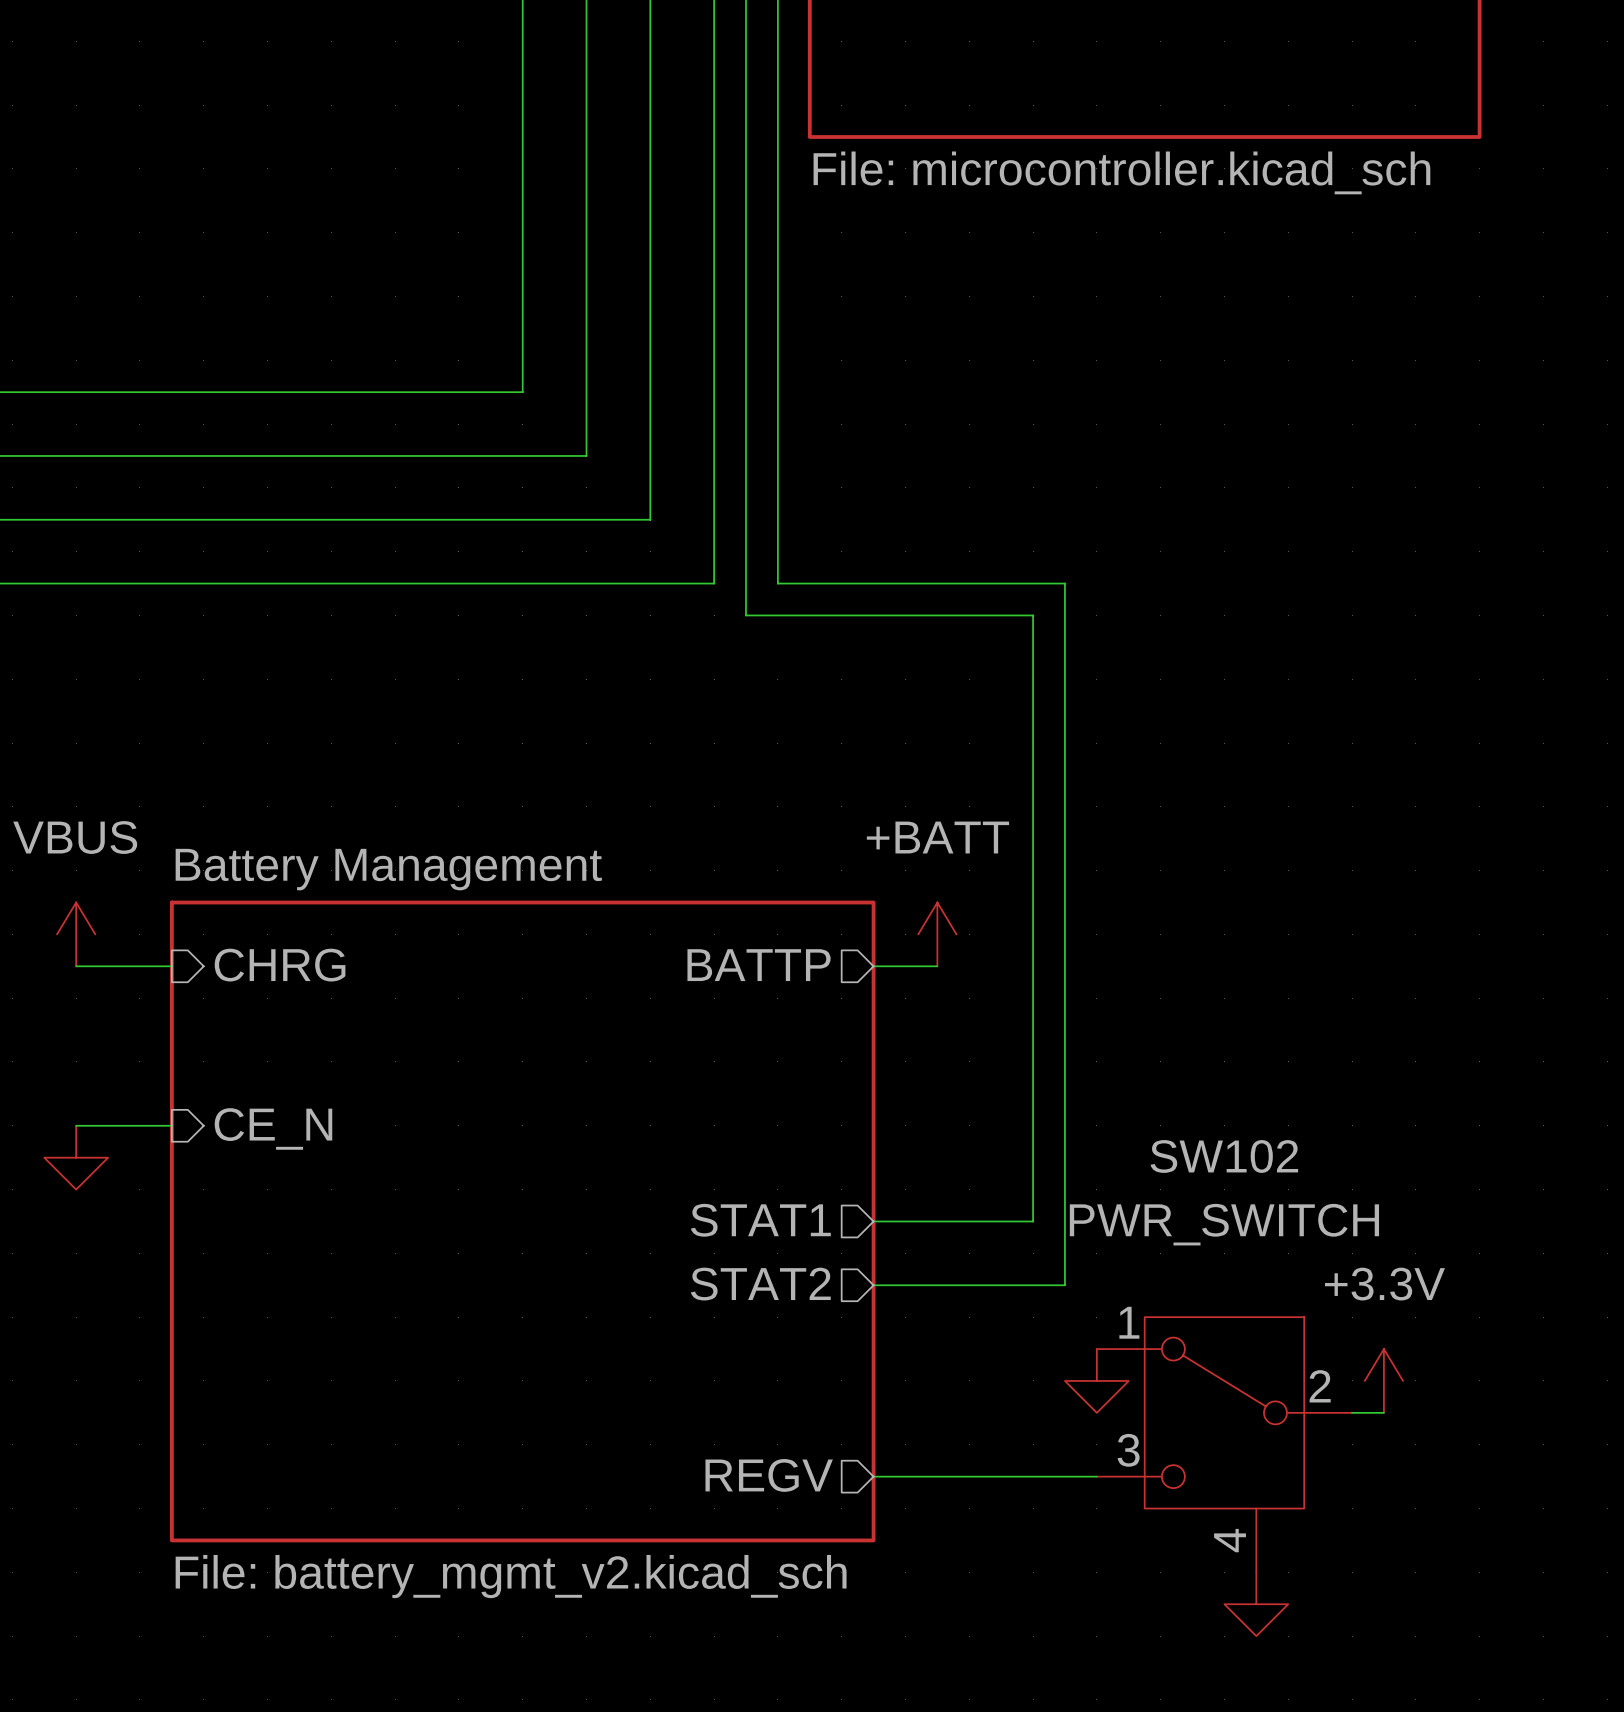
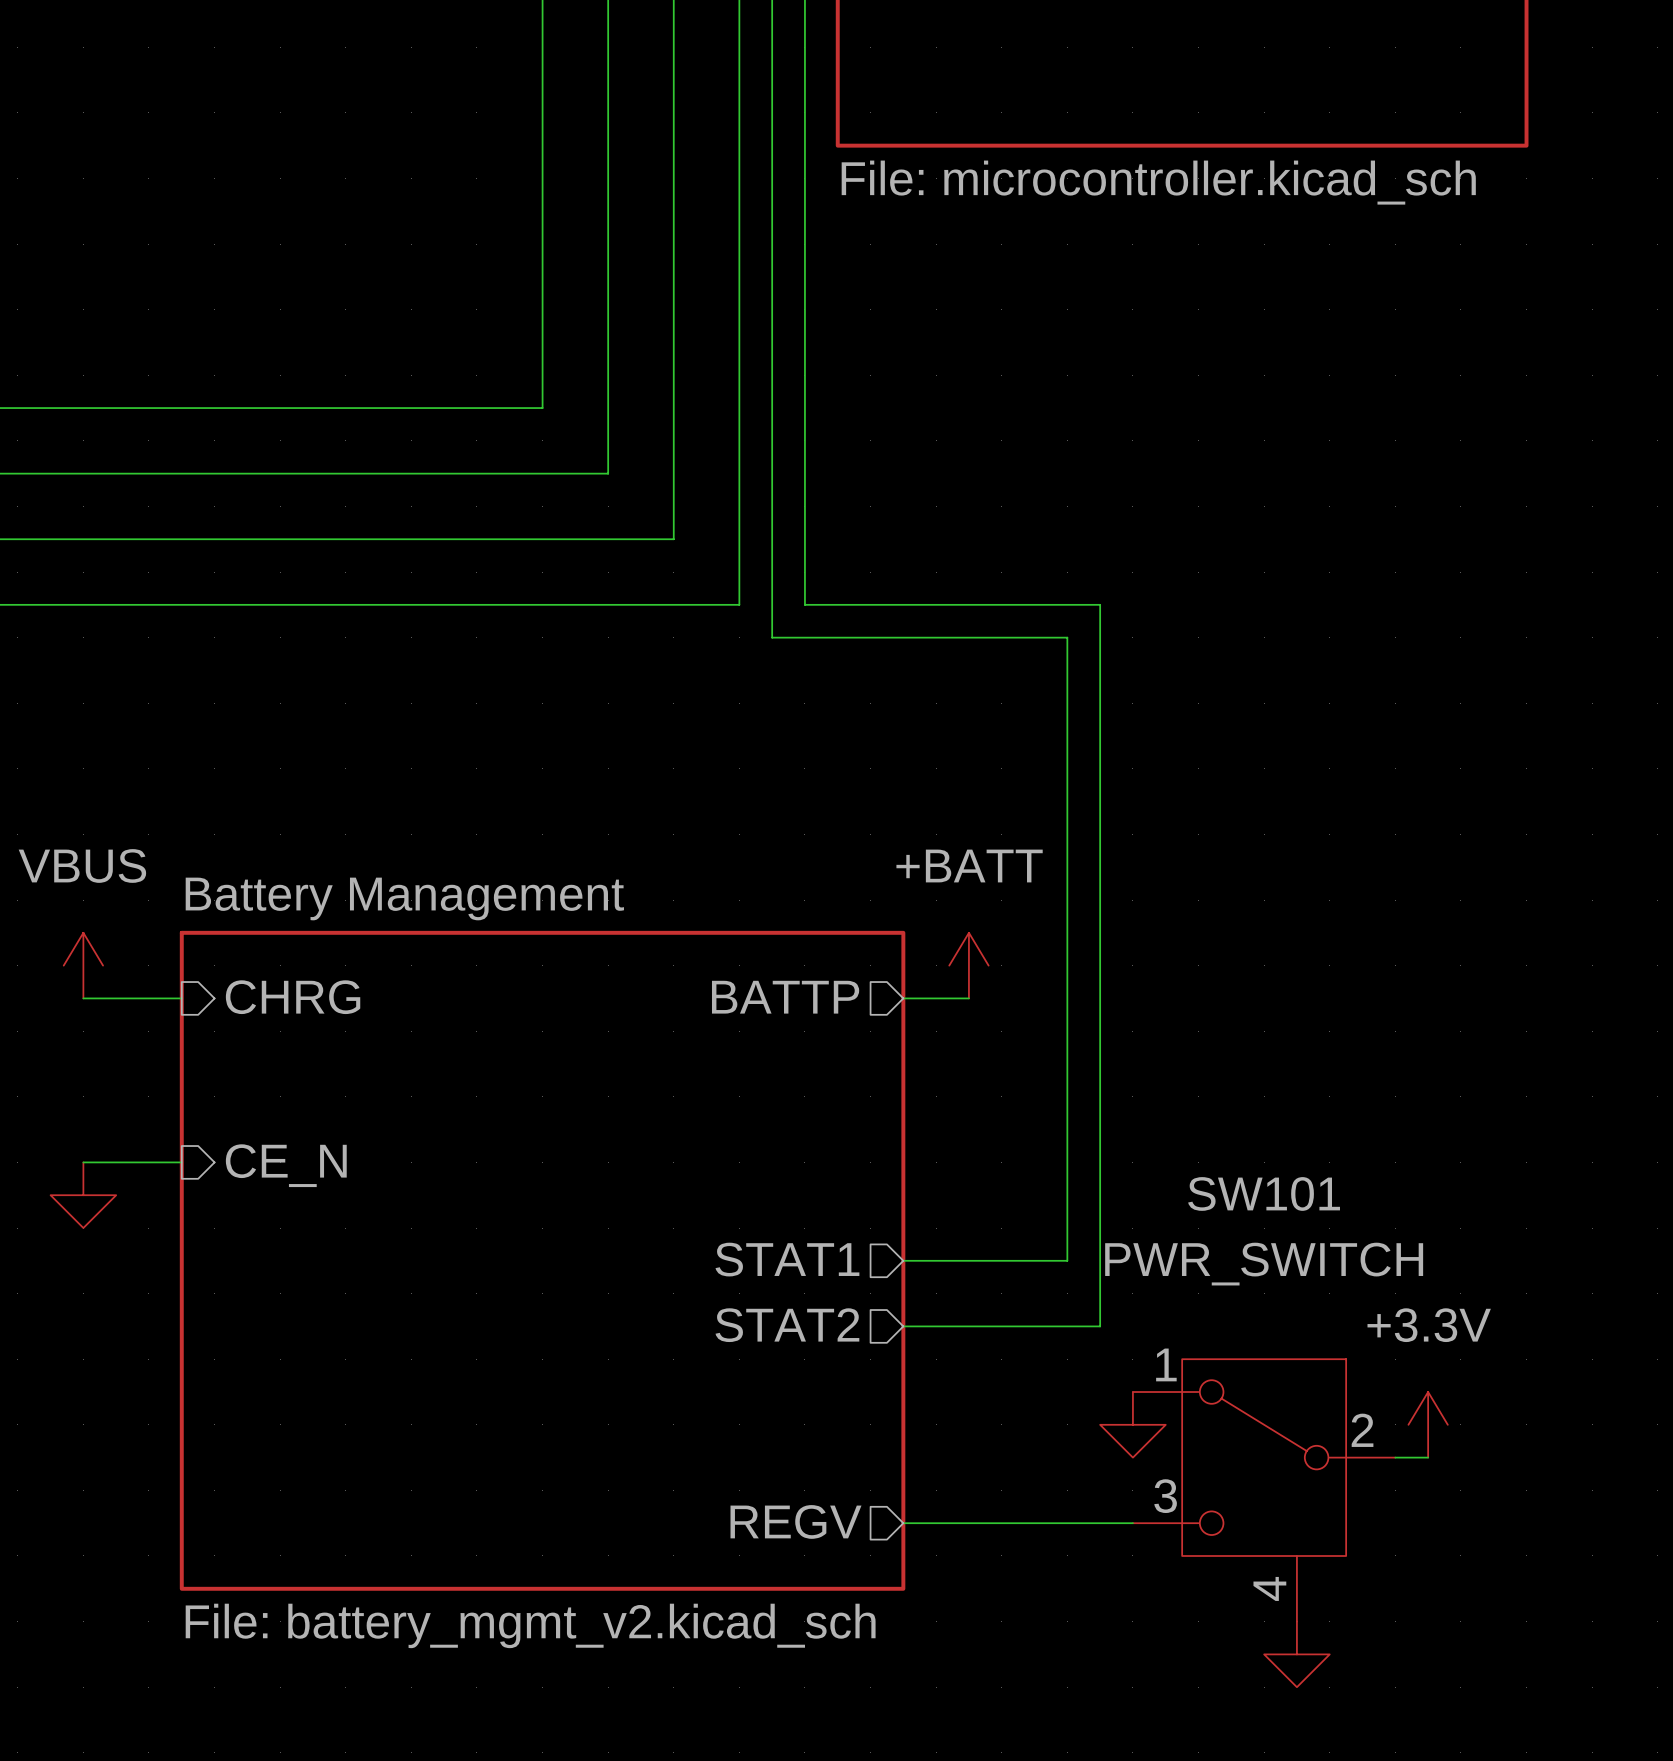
SW102 name: SW102 (1224, 1156) -> SW101 (1264, 1193)

